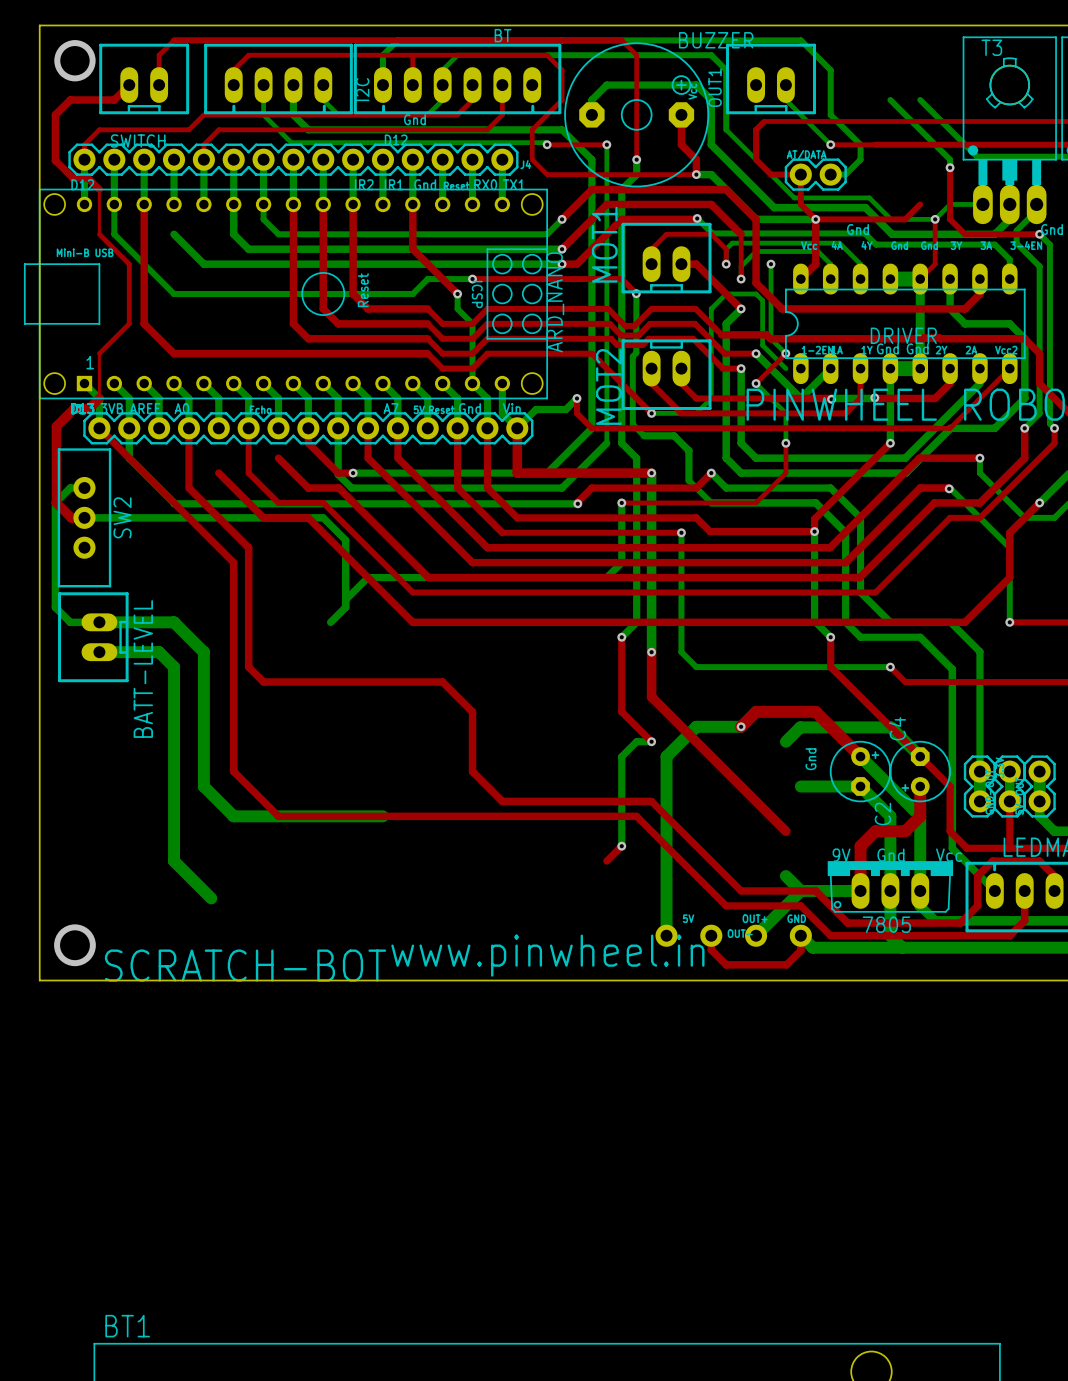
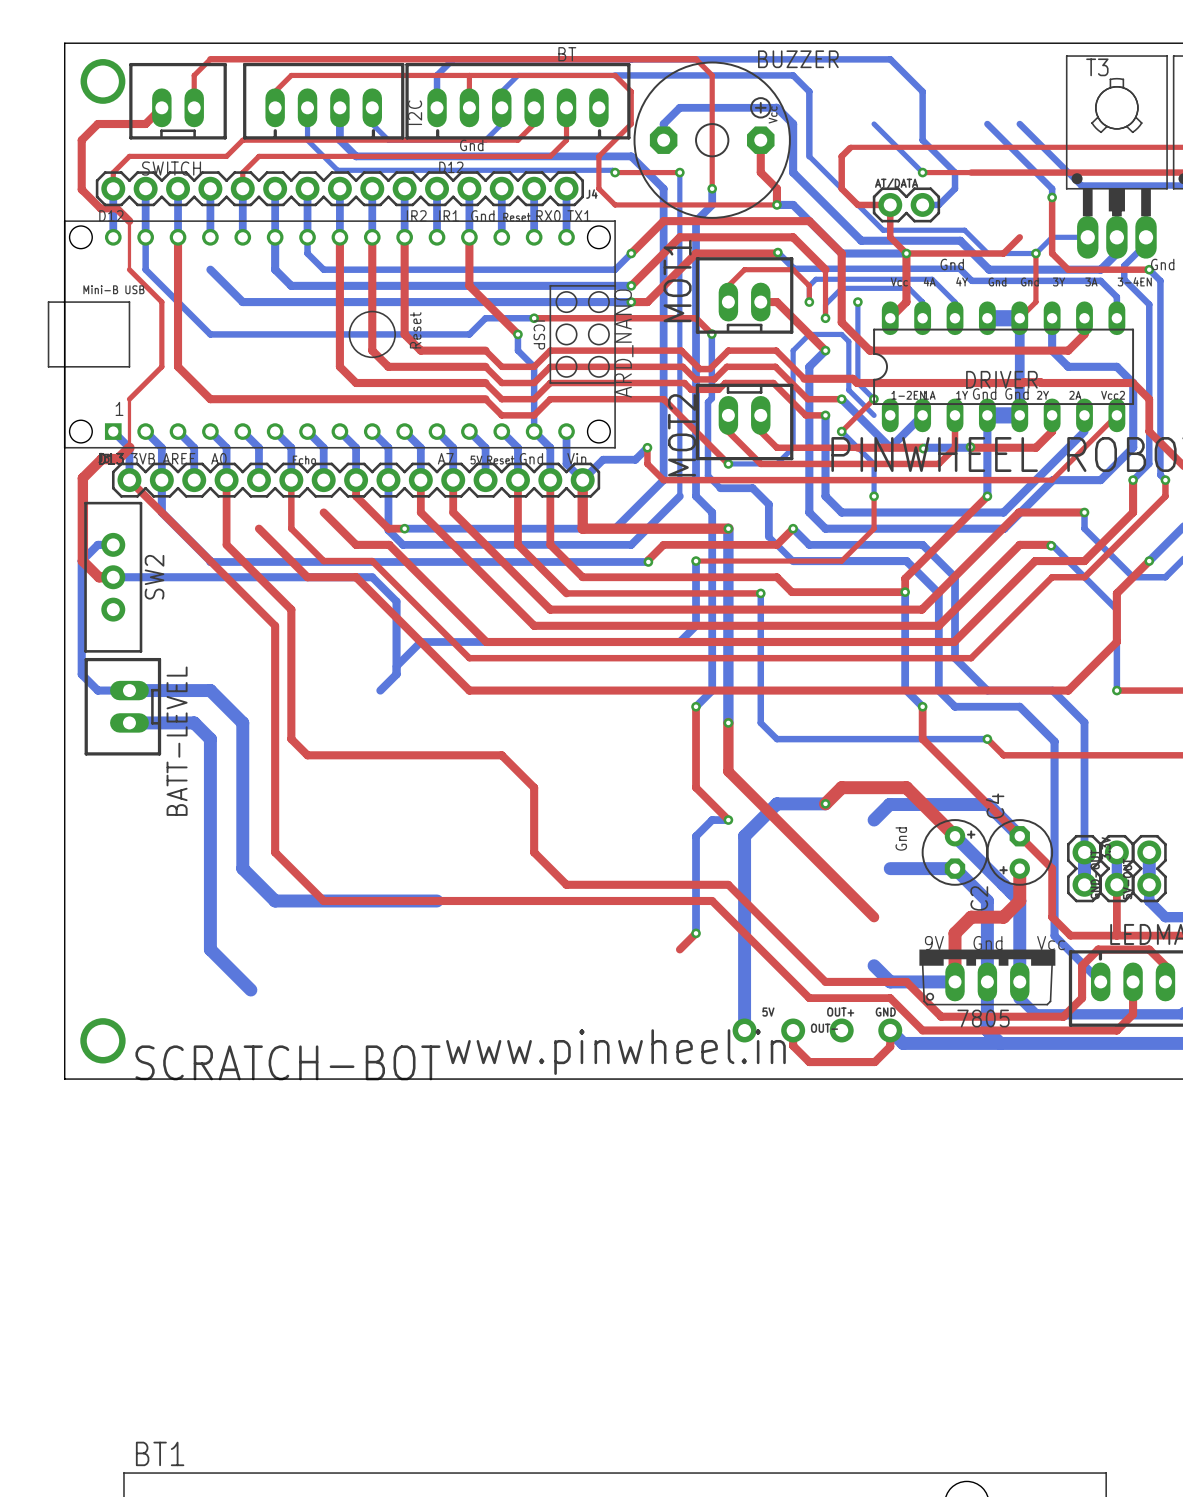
OUT1: (771, 78) -> none
bottom track: (800, 890) (756, 935) -> none

